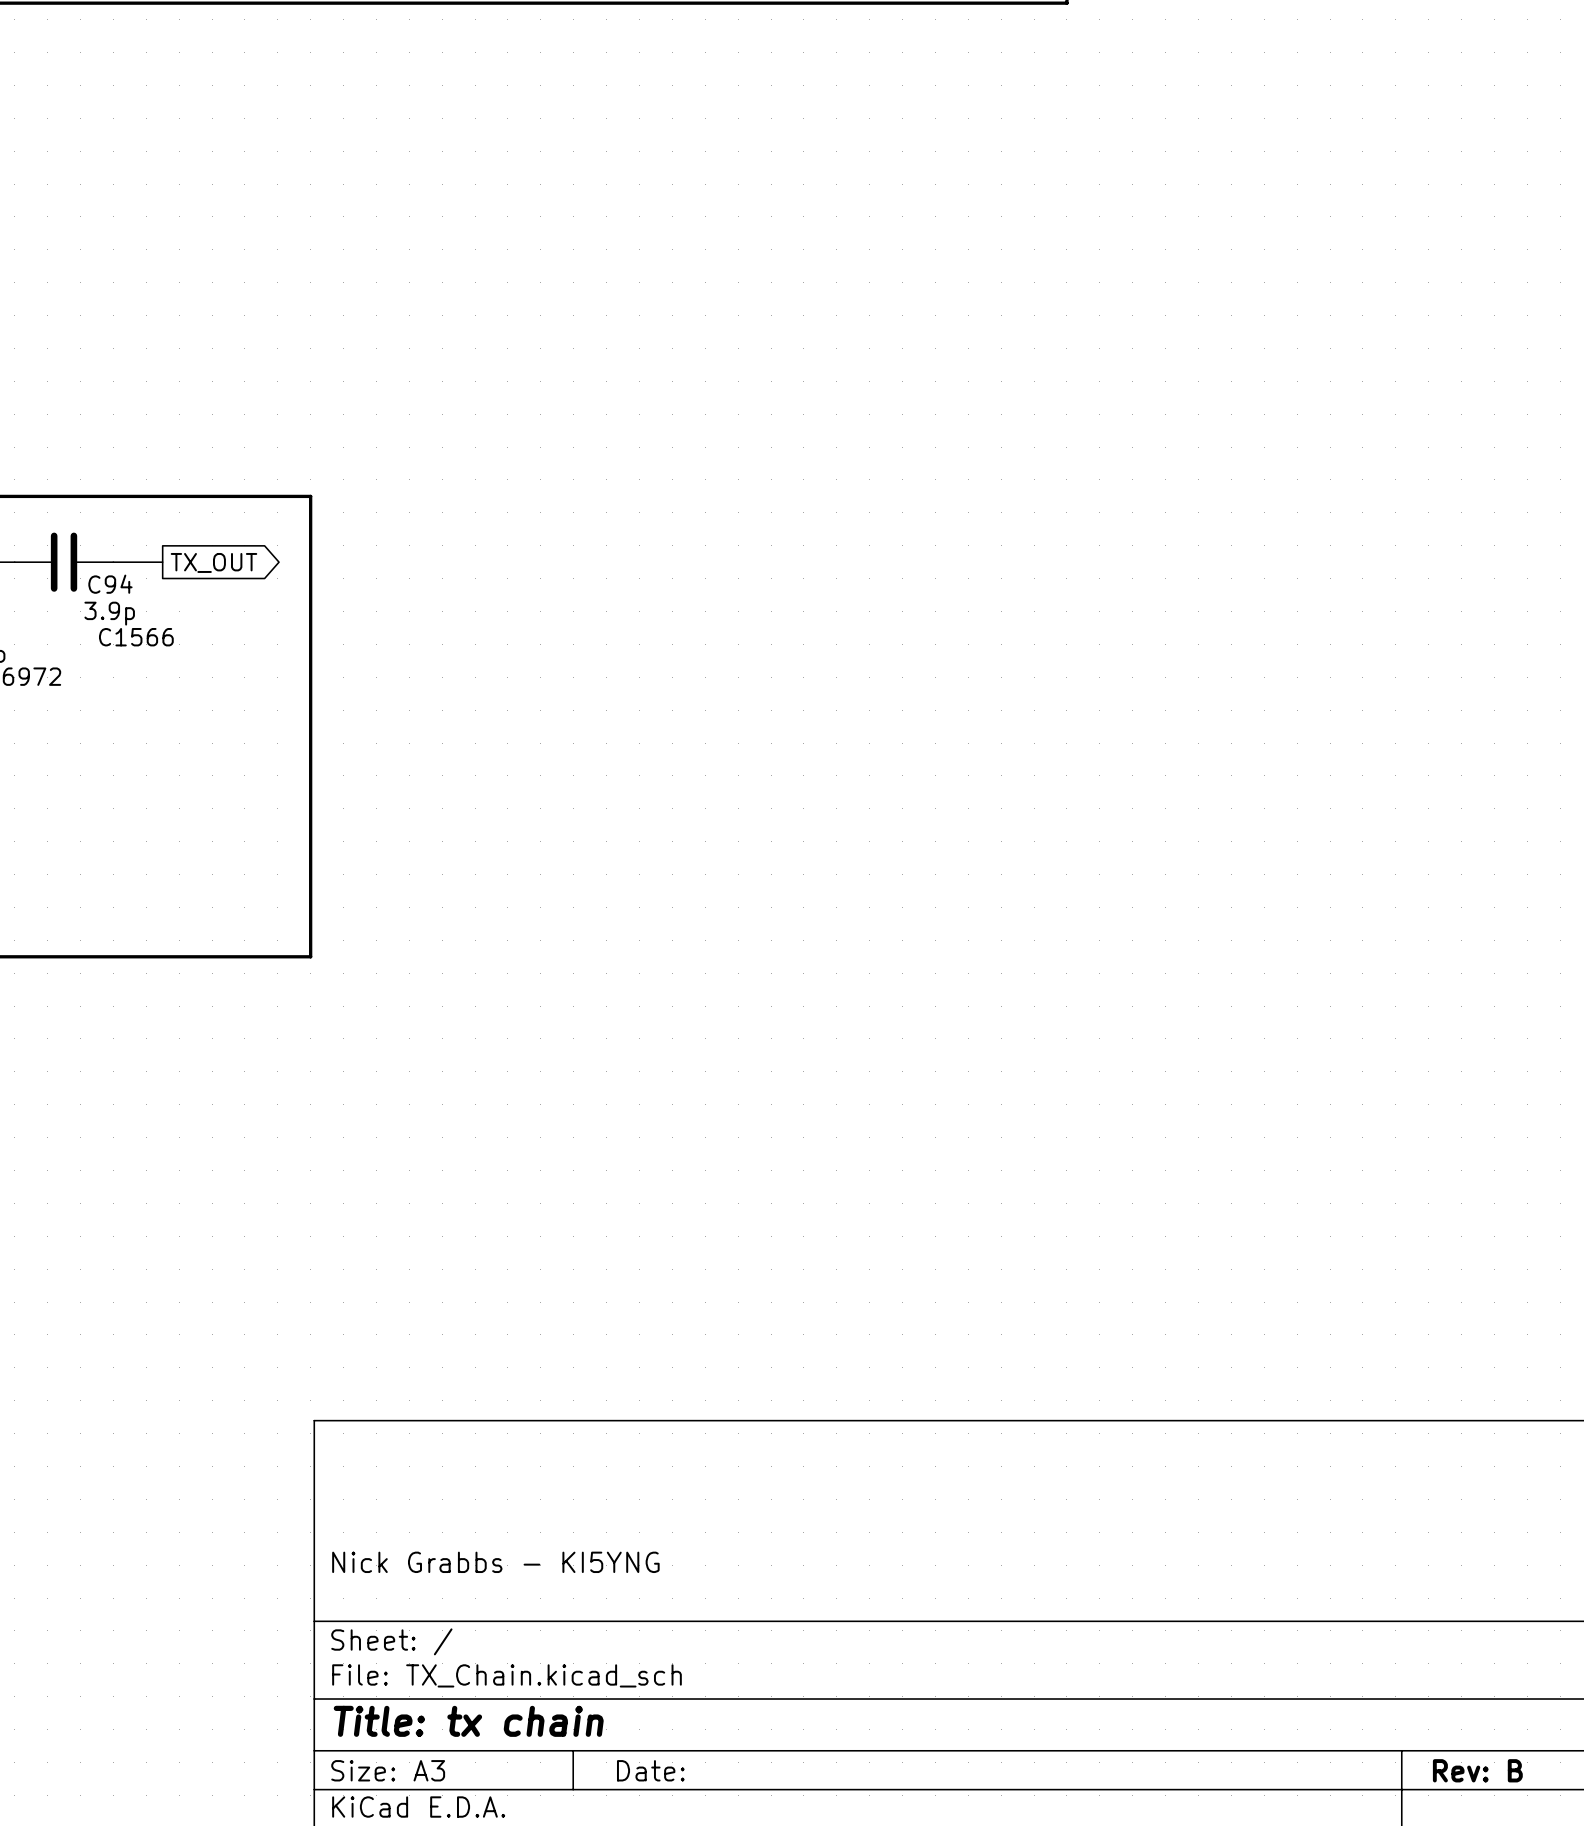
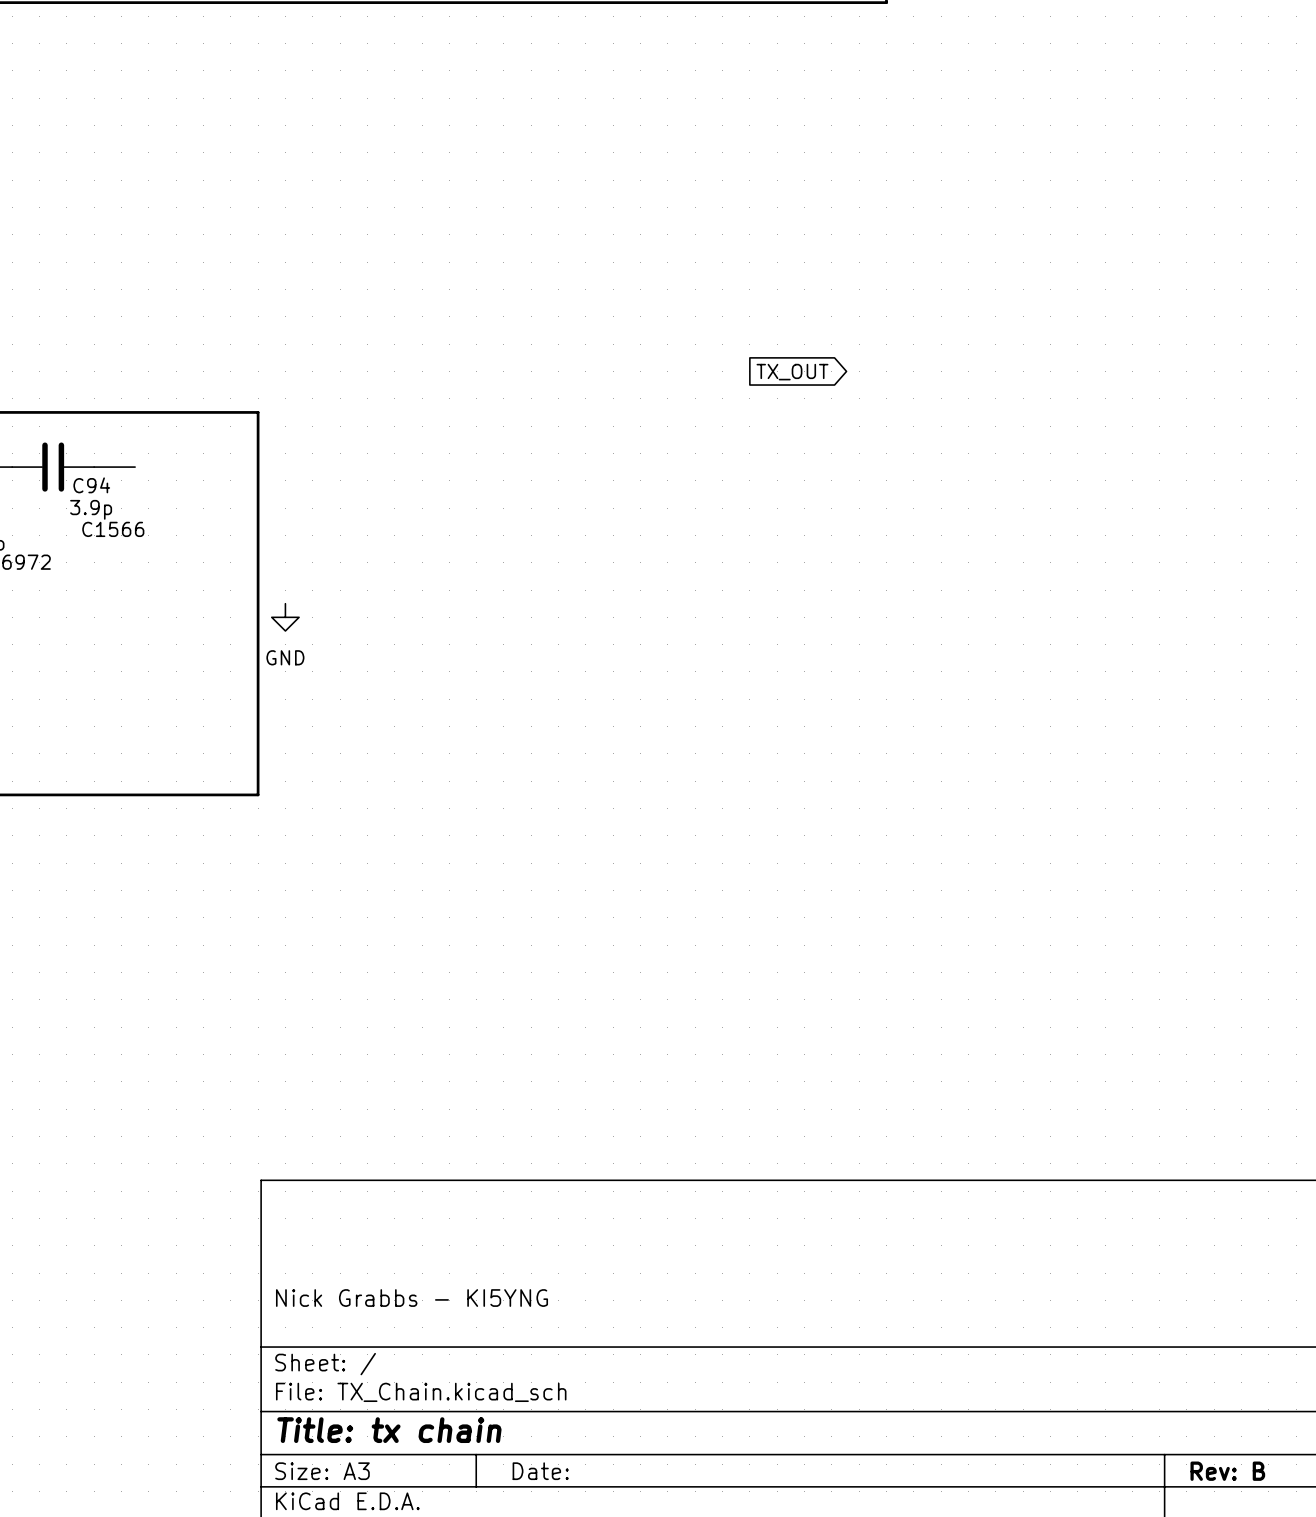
global label: none -> TX_OUT (792, 372)
global label: TX_OUT (213, 562) -> none
power symbol: none -> GND (285, 617)

